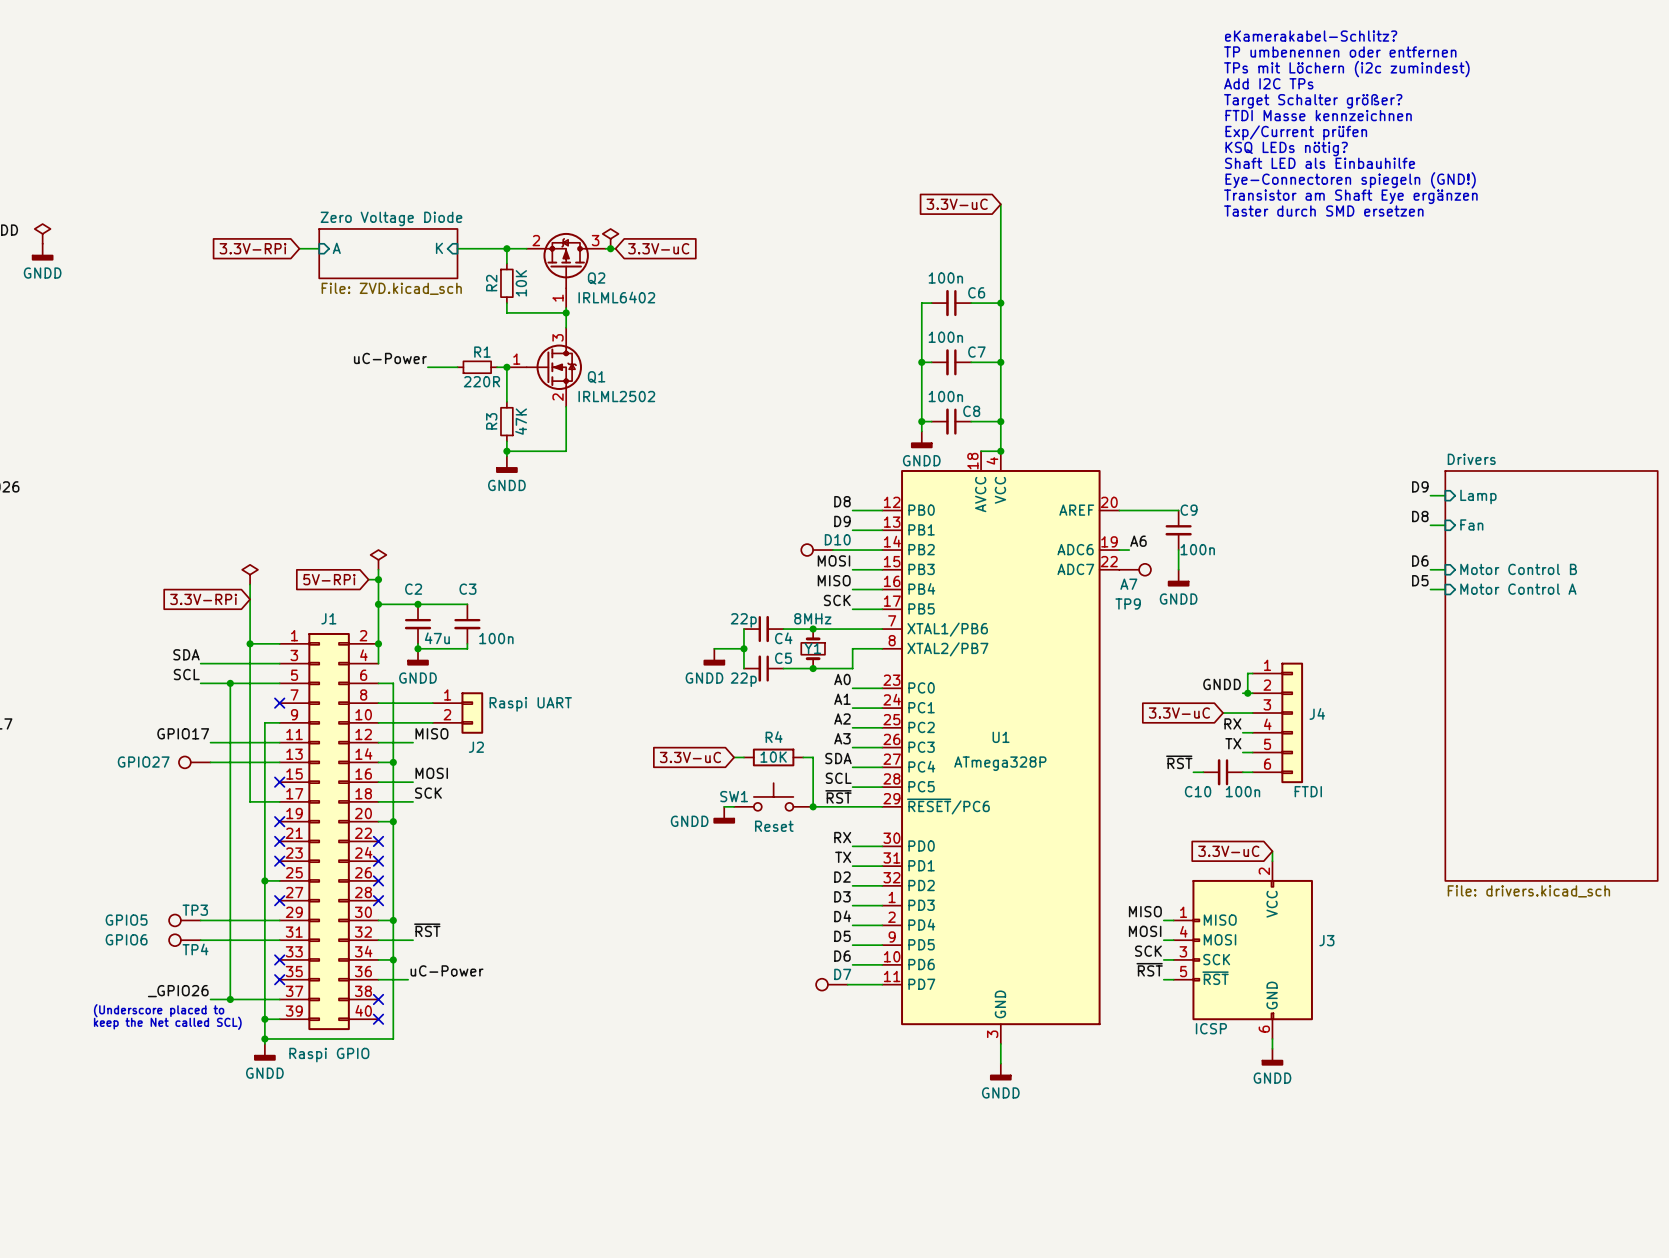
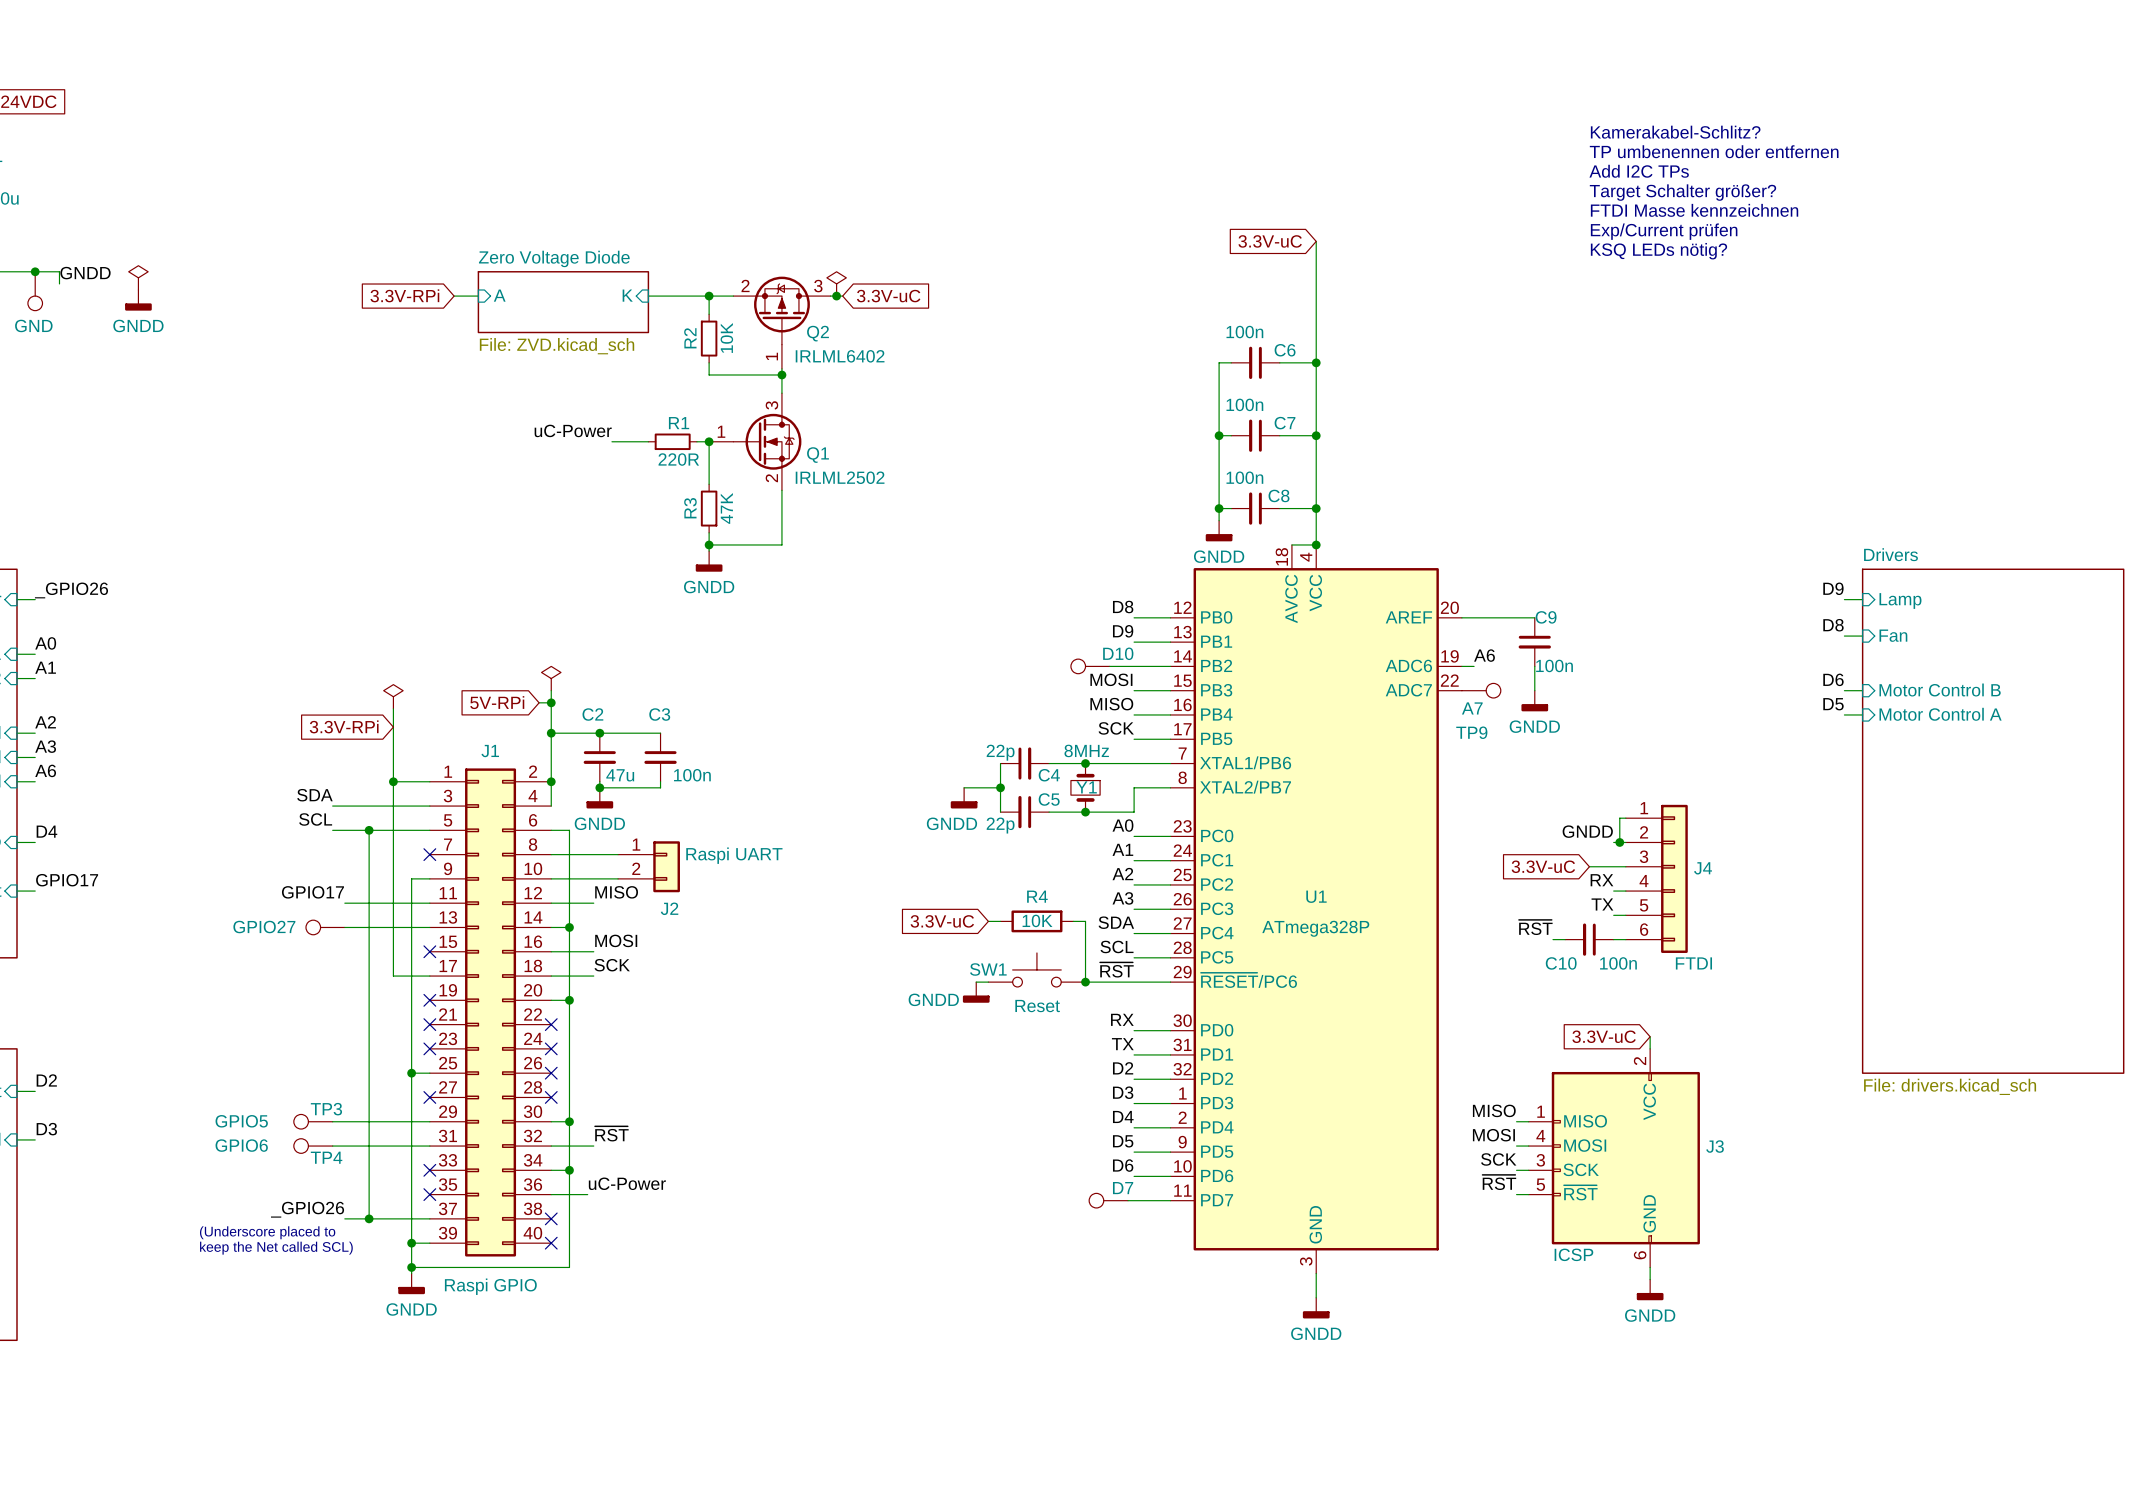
text: eKamerakabel-Schlitz? (1311, 36) -> none
text: TP umbenennen oder entfernen (1340, 51) -> none
text: TPs mit Löchern (i2c zumindest) (1346, 69) -> none
text: Add I2C TPs (1268, 83) -> none
text: Target Schalter größer? (1313, 101) -> none
text: FTDI Masse kennzeichnen (1318, 115) -> Kamerakabel-Schlitz? (1675, 132)
text: Exp/Current prüfen (1296, 132) -> TP umbenennen oder entfernen (1714, 151)
text: KSQ LEDs nötig? (1286, 149) -> Add I2C TPs (1639, 171)
text: Shaft LED als Einbauhilfe (1320, 163) -> Target Schalter größer? (1682, 192)
text: Eye-Connectoren spiegeln (GND!) (1350, 180) -> FTDI Masse kennzeichnen (1694, 210)
text: Transistor am Shaft Eye ergänzen (1350, 196) -> Exp/Current prüfen (1664, 231)
text: Taster durch SMD ersetzen (1323, 211) -> KSQ LEDs nötig? (1658, 251)

